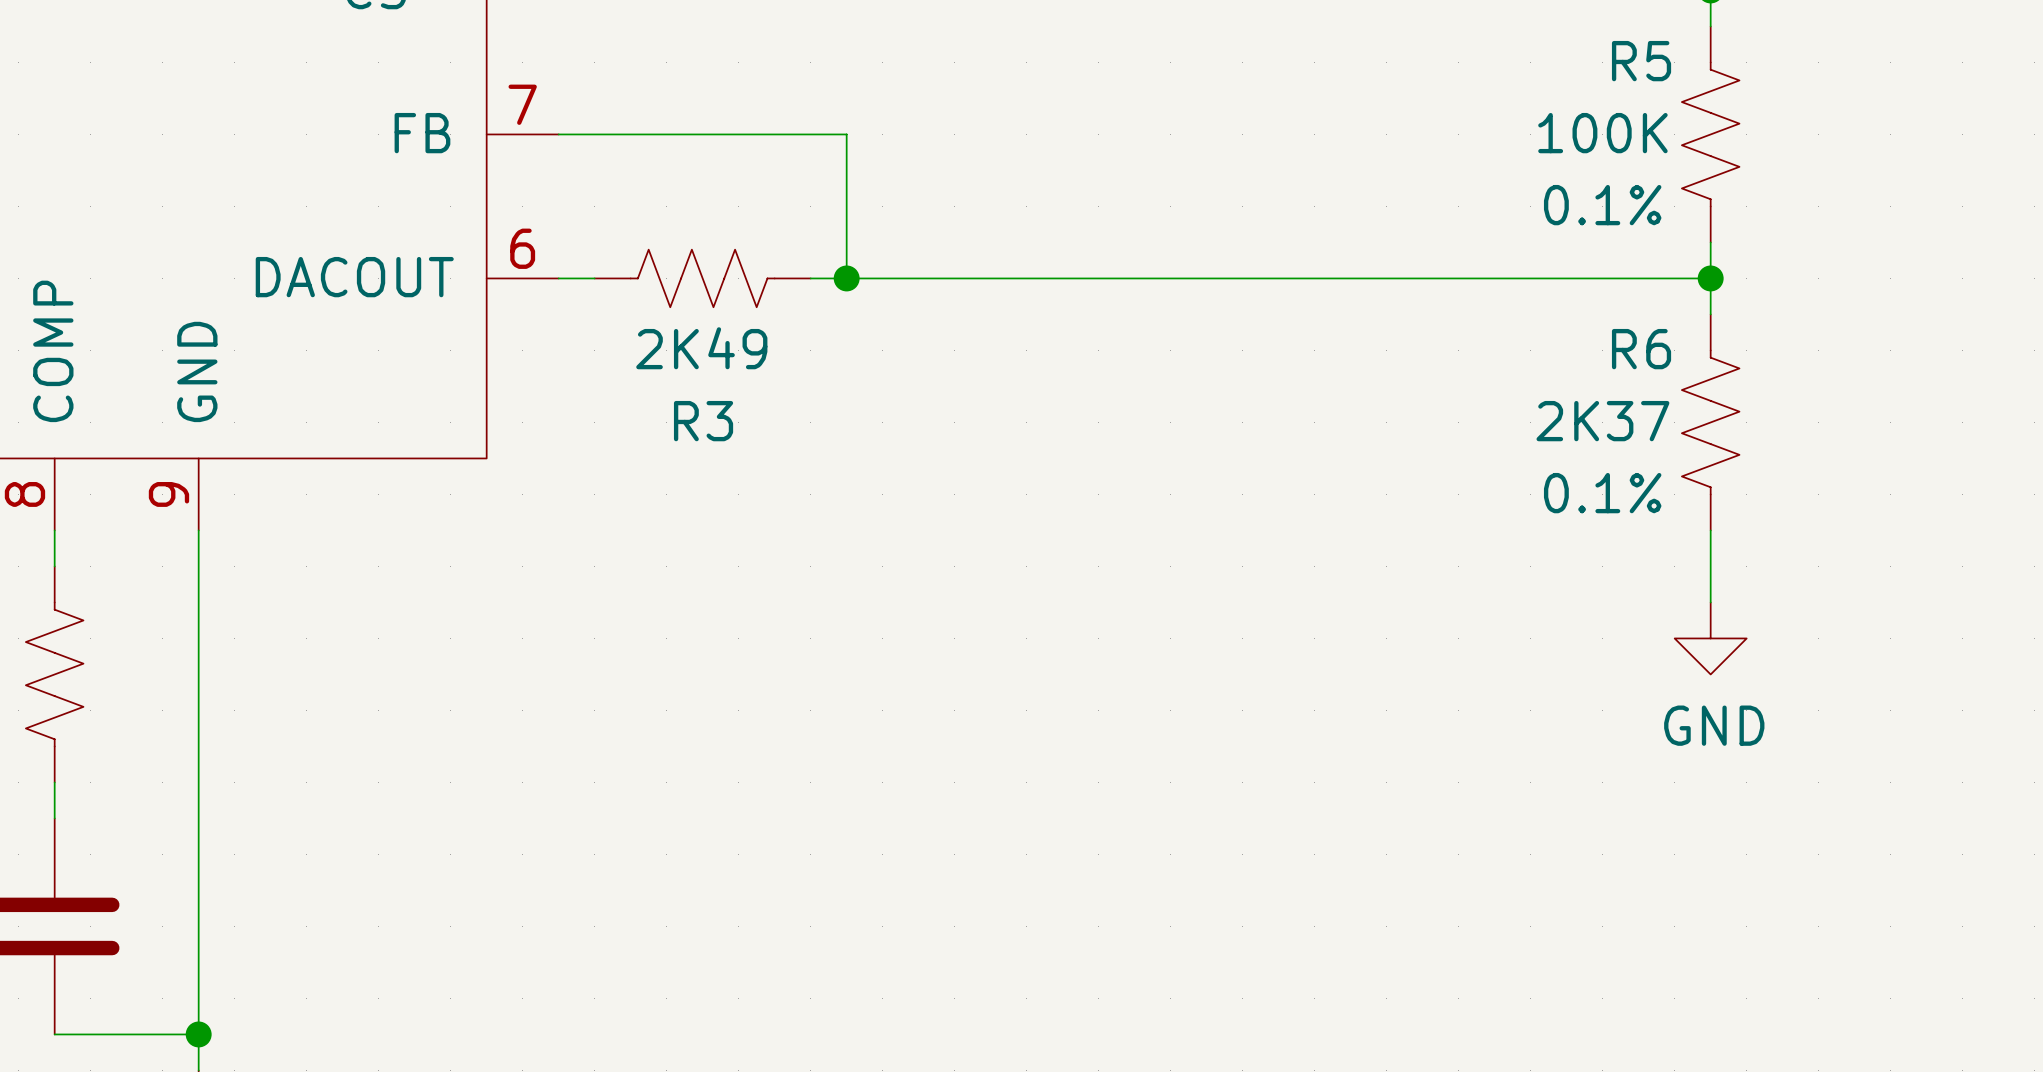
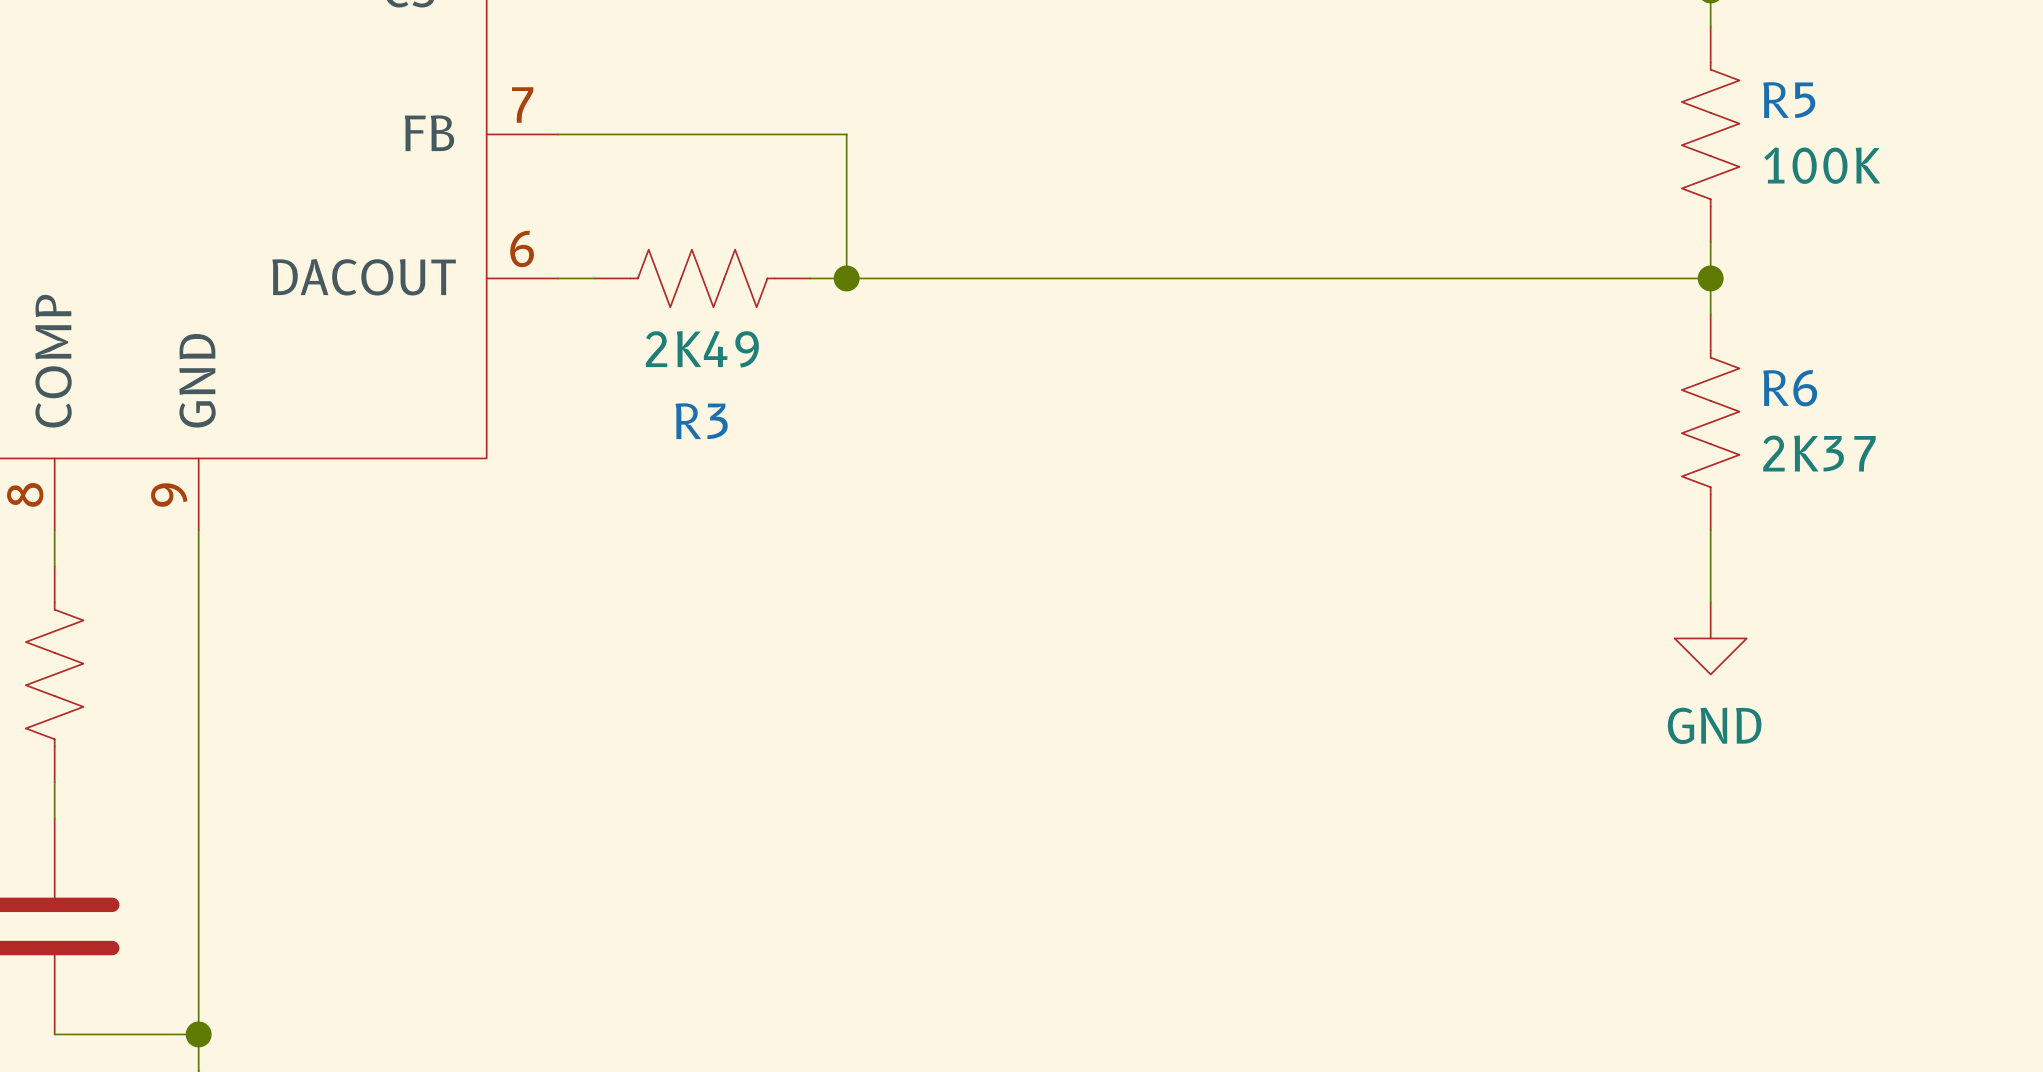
R5 name position: R5 (1641, 61) -> R5 (1789, 100)
R5 value position: 100K (1602, 133) -> 100K (1822, 165)
R5 text: 0.1% (1602, 205) -> none
R6 name position: R6 (1641, 349) -> R6 (1790, 388)
R6 value position: 2K37 (1602, 421) -> 2K37 (1819, 453)
R6 text: 0.1% (1602, 493) -> none

